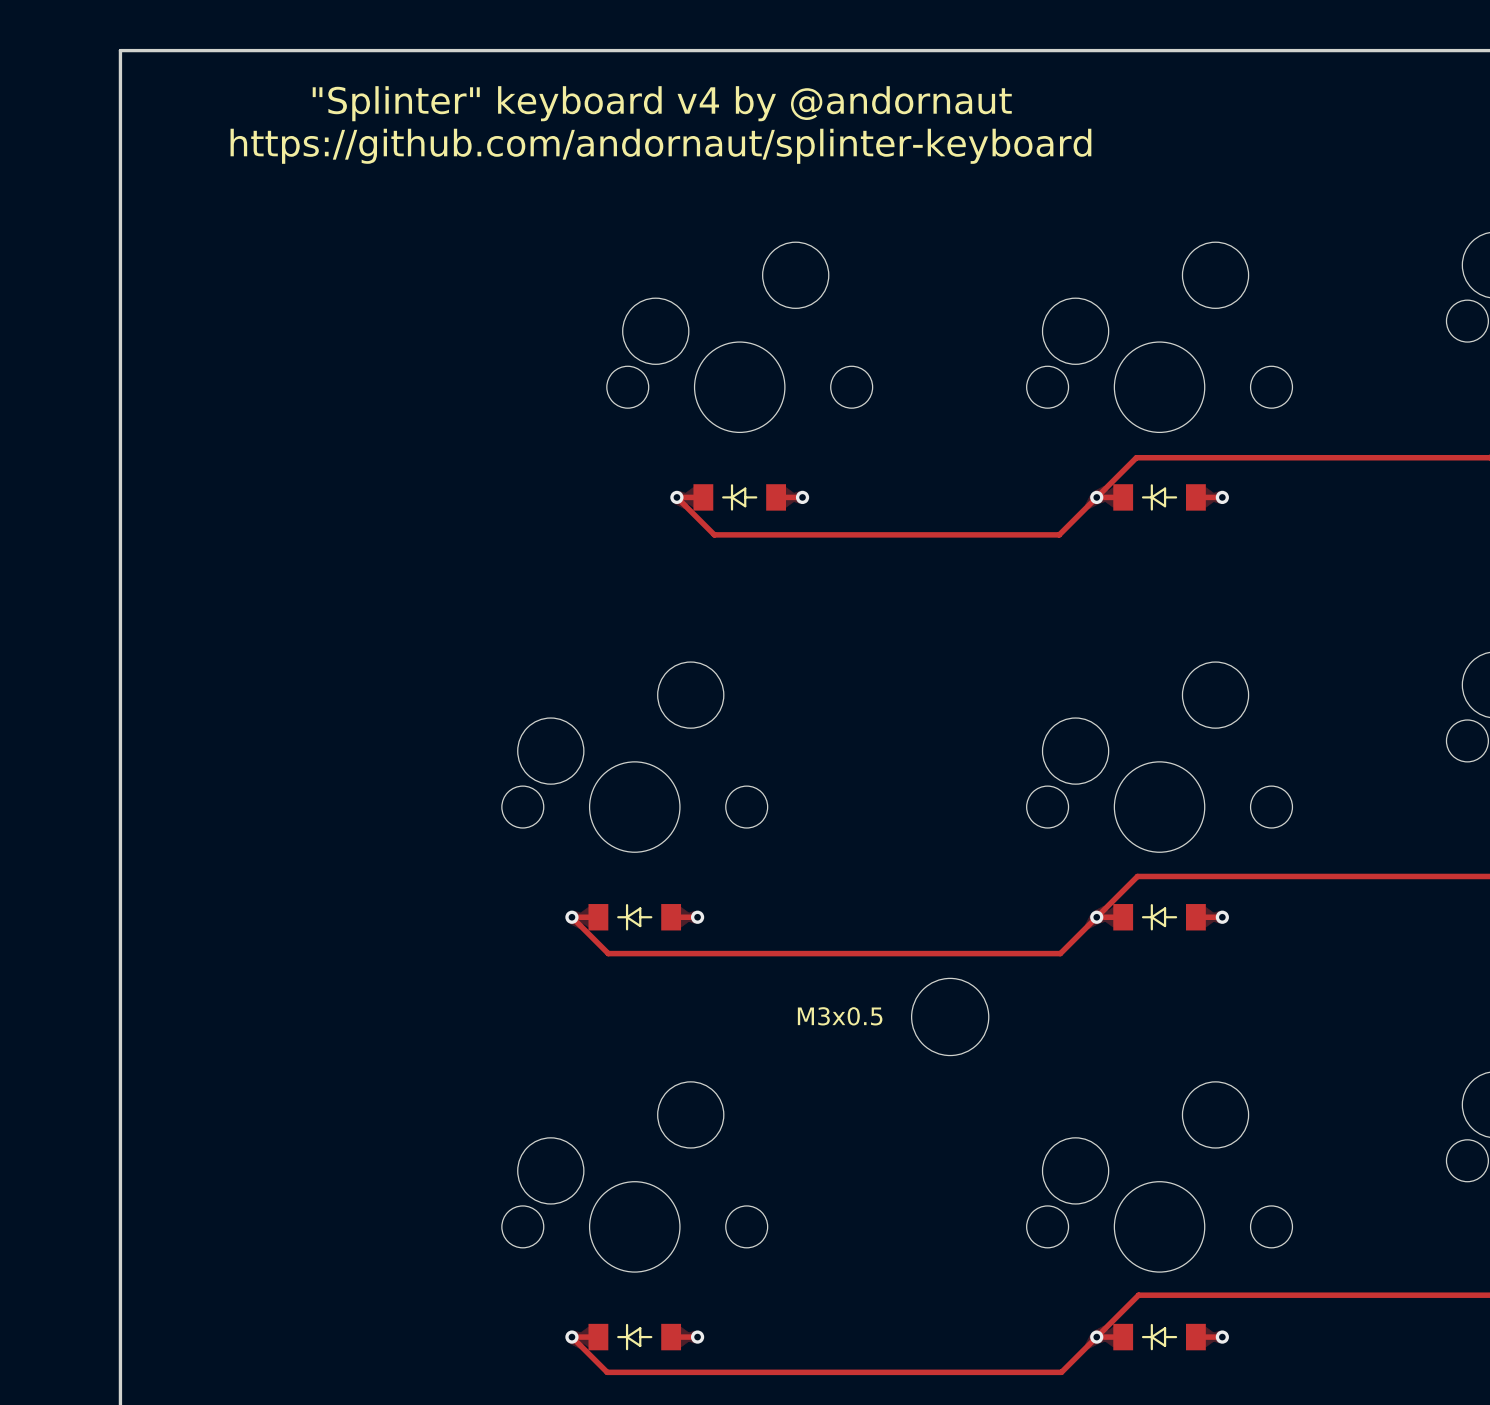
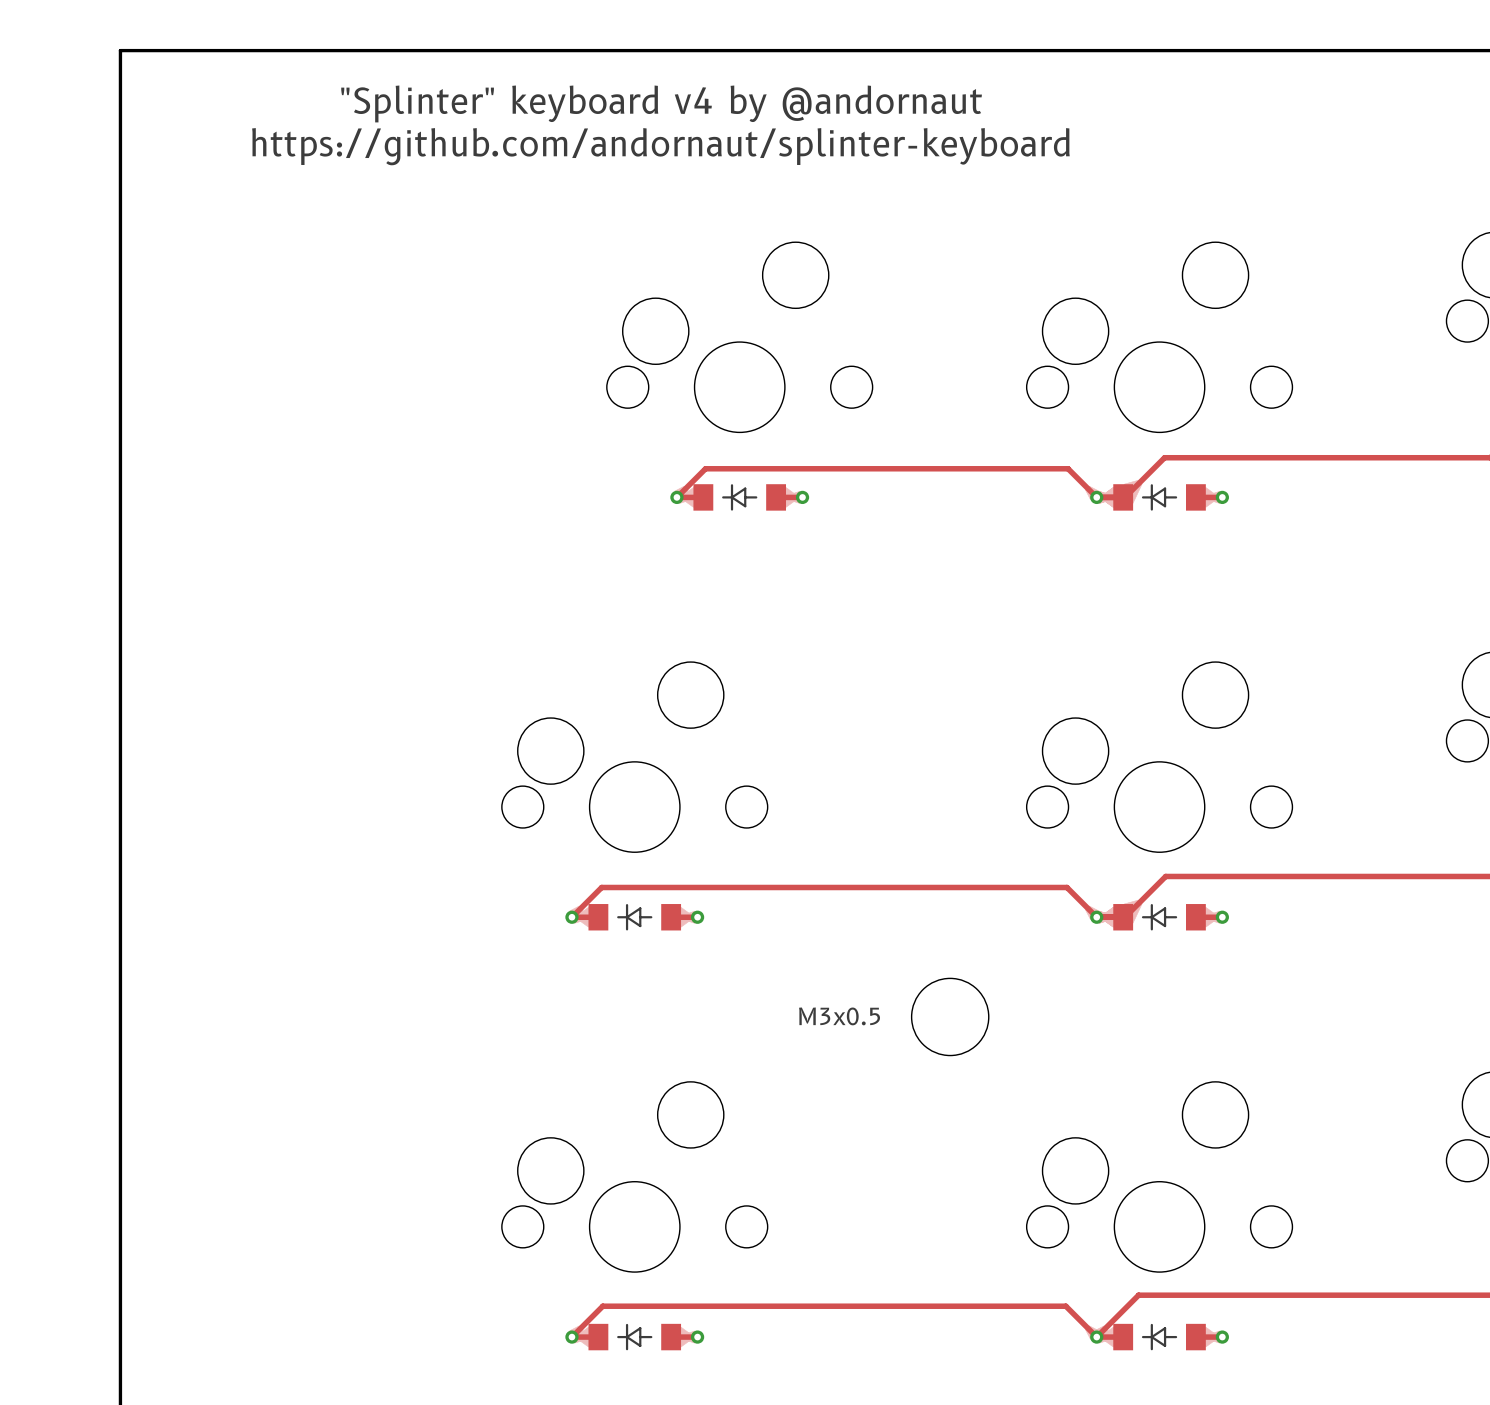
track: (1164, 457) (1136, 457) (1059, 534) (714, 534) (676, 497) -> (1096, 497) (1068, 468) (705, 468) (676, 497)
track: none -> (1164, 457) (1123, 497)
track: (1165, 876) (1137, 876) (1060, 953) (608, 953) (571, 917) -> (1096, 917) (1066, 887) (601, 887) (571, 917)
track: none -> (1165, 876) (1123, 917)
track: (571, 1337) (607, 1372) (1061, 1372) (1096, 1337) -> (571, 1337) (602, 1306) (1065, 1306) (1096, 1337)

